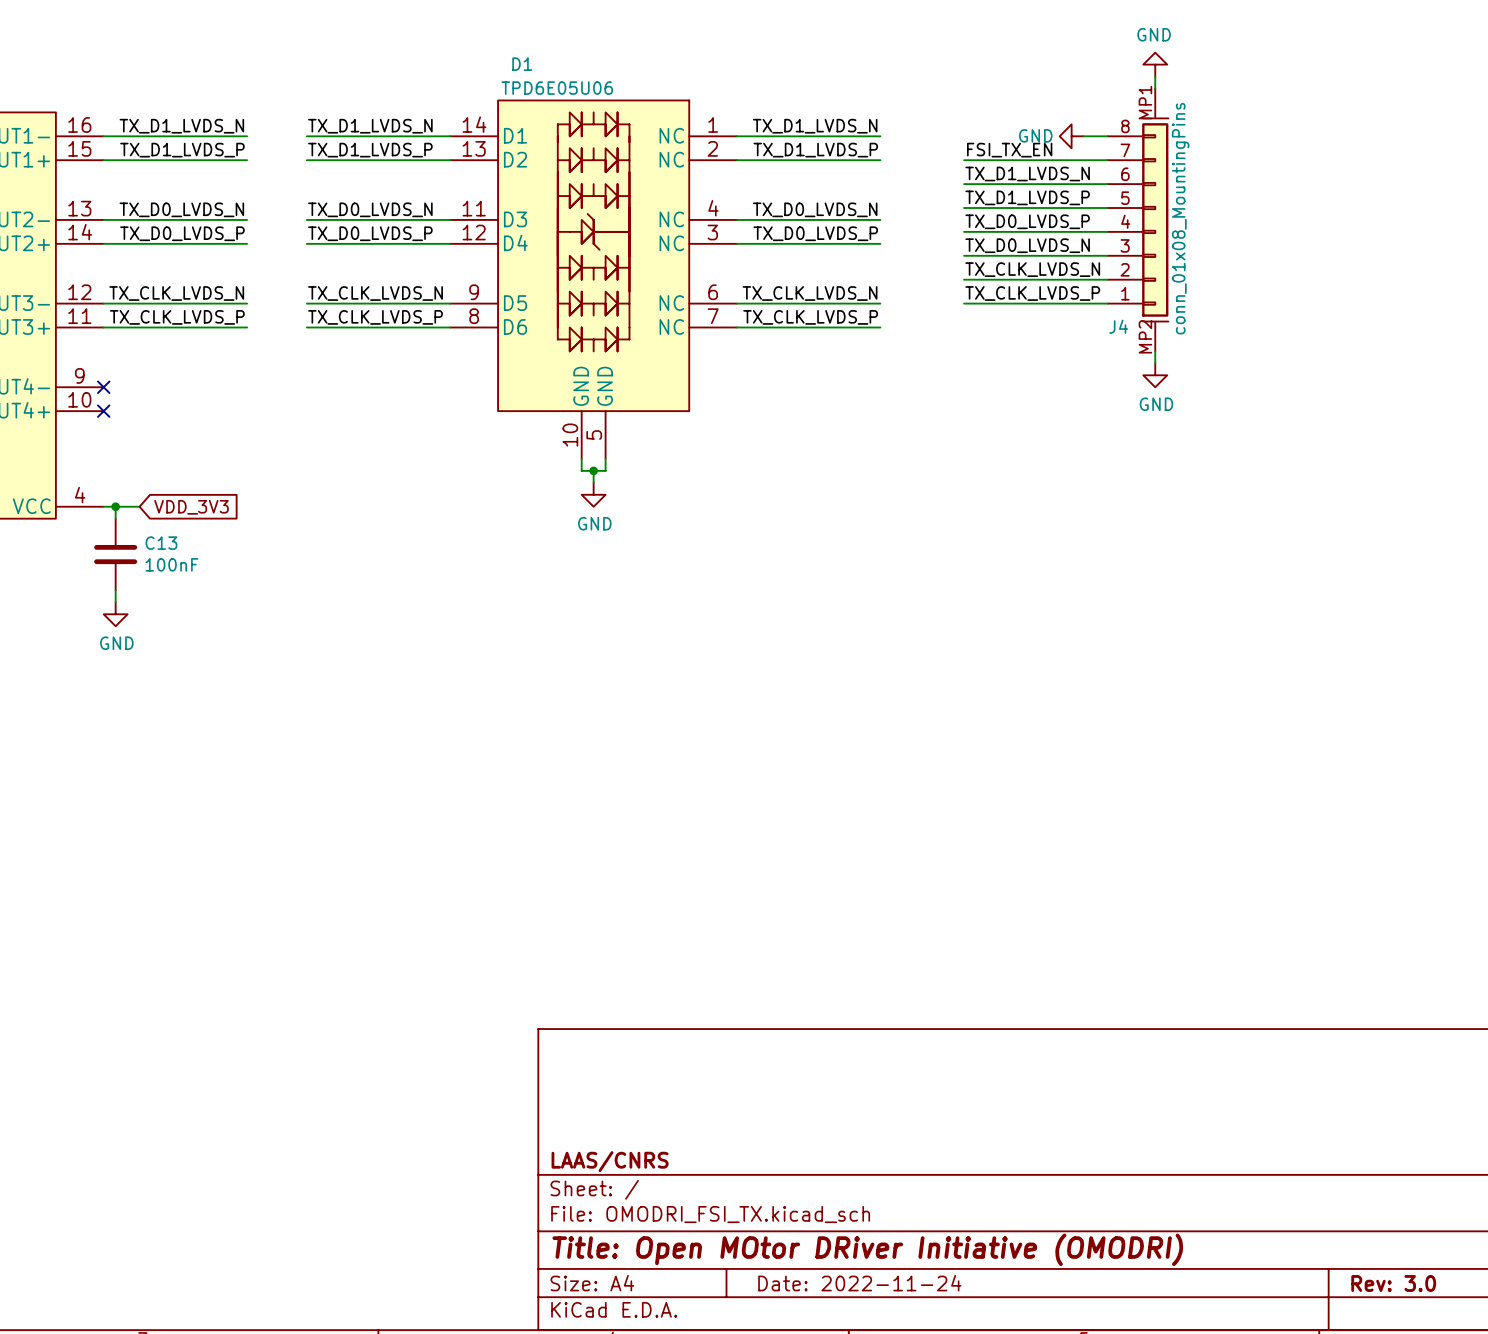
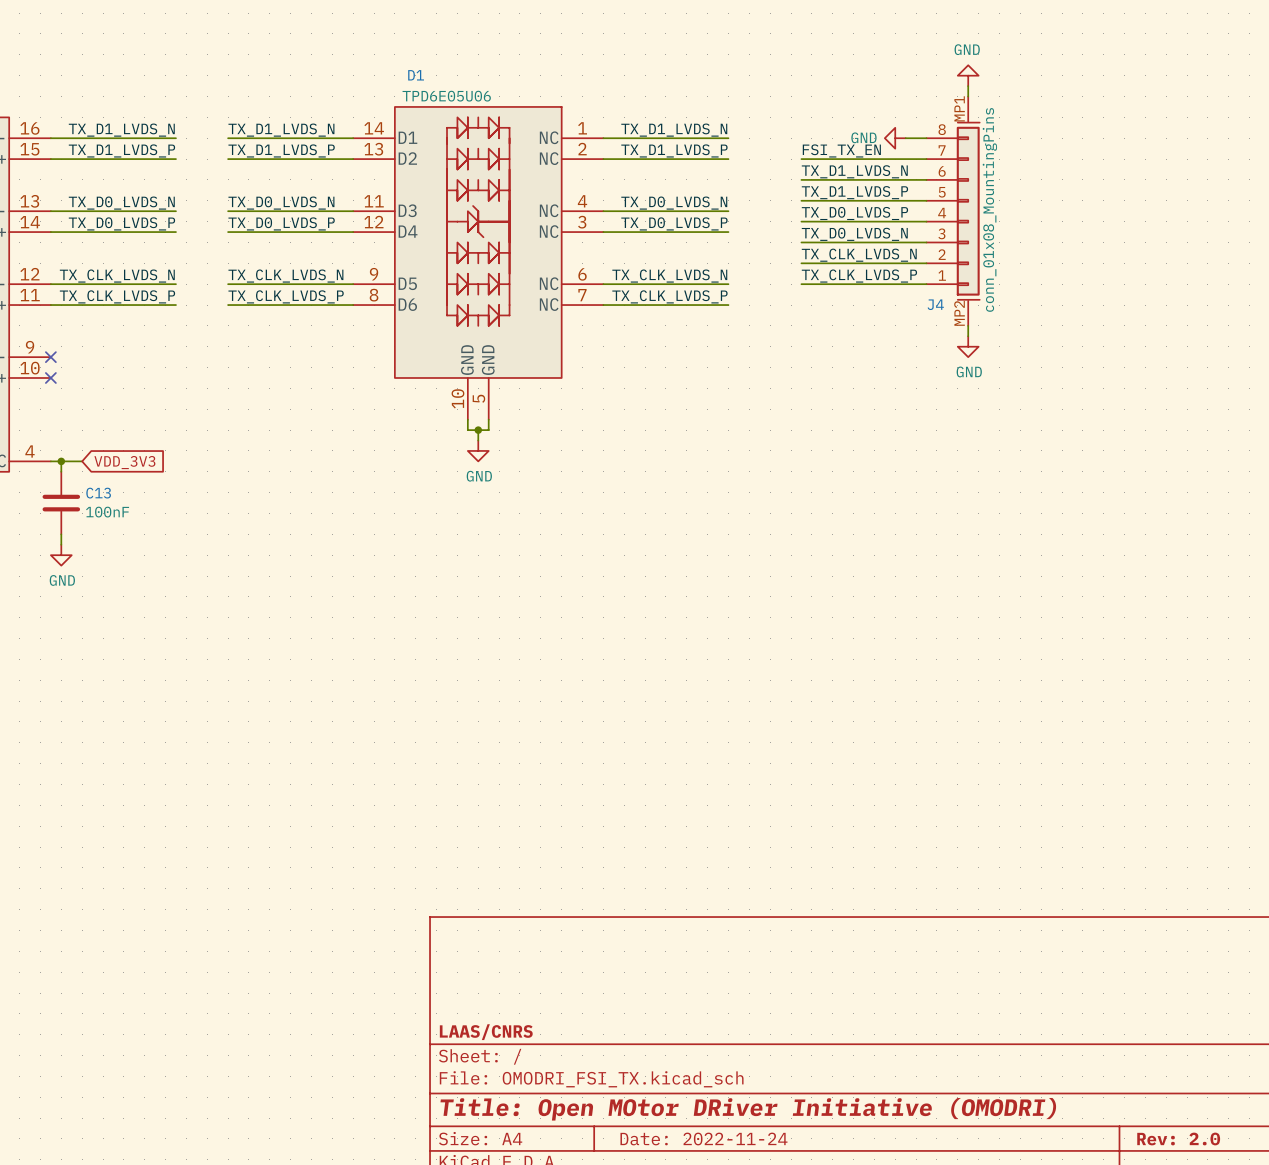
title block: Rev: 3.0 (1393, 1283) -> Rev: 2.0 (1178, 1138)

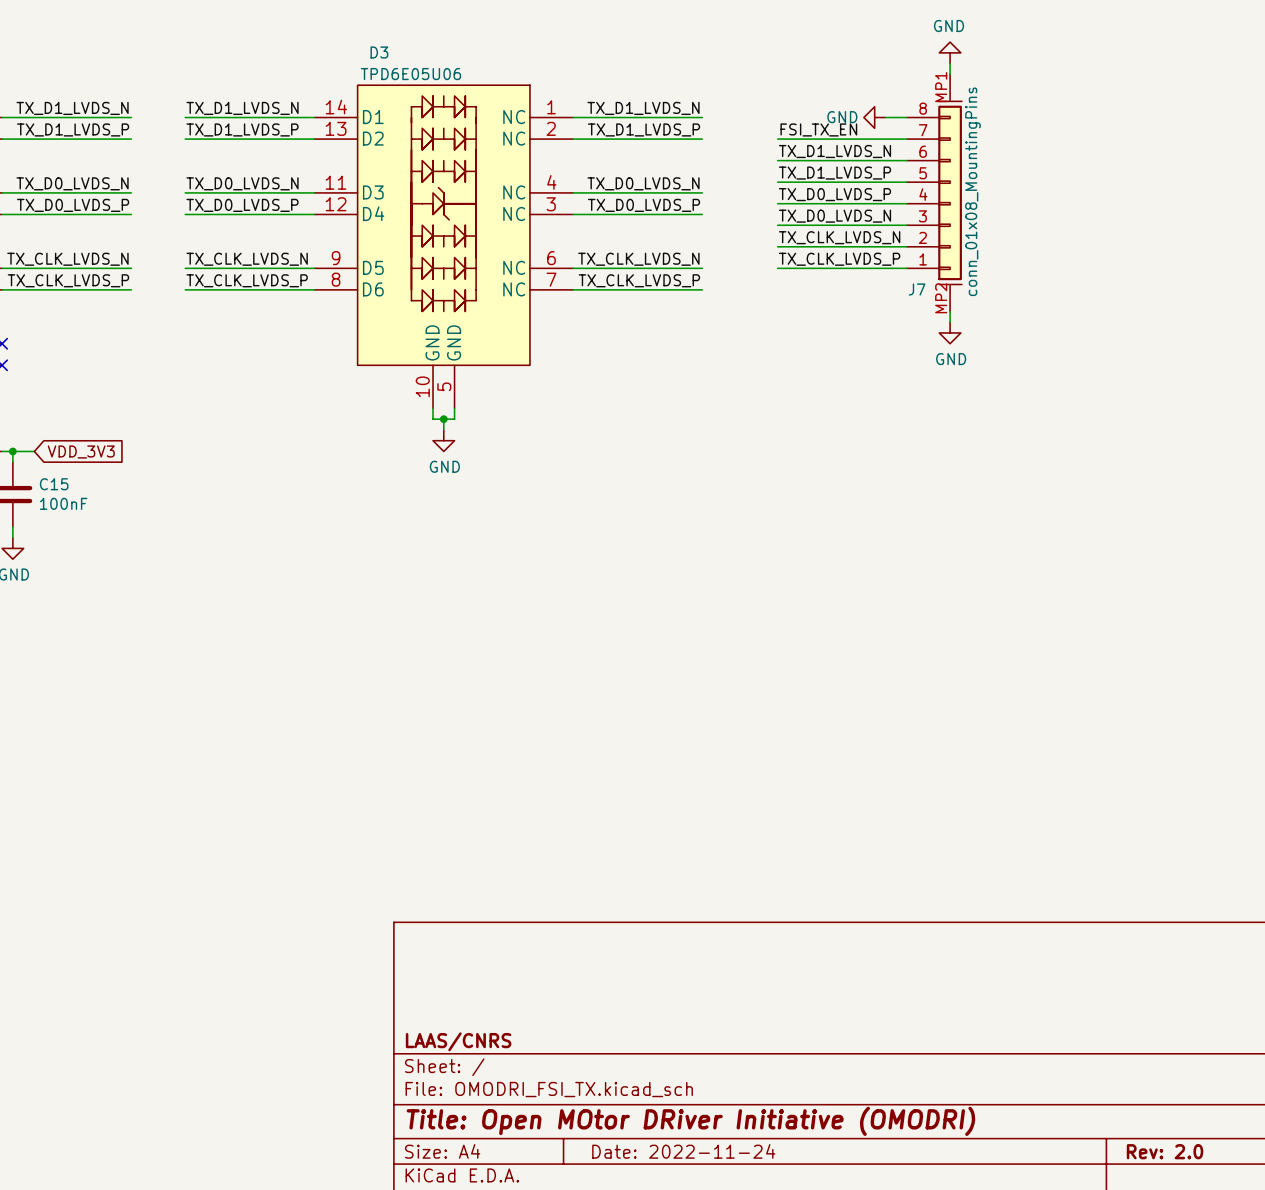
D1 name: D1 (416, 75) -> D3 (379, 52)
J4 name: J4 (935, 304) -> J7 (917, 289)
C13 name: C13 (98, 493) -> C15 (54, 484)

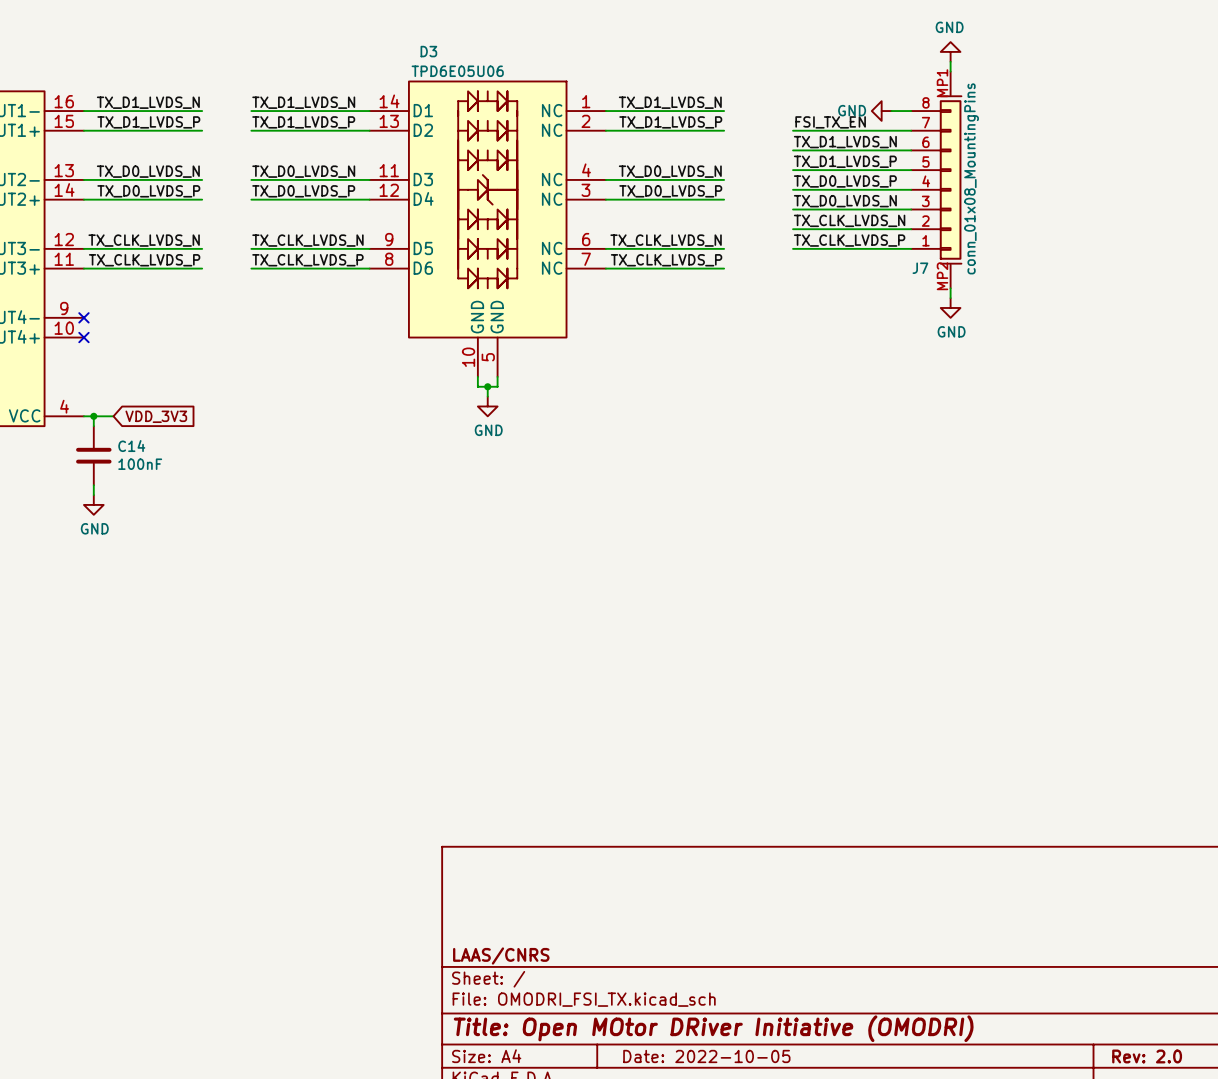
C15 name: C15 (54, 484) -> C14 (131, 446)
title block: Date: 2022-11-24 (683, 1151) -> Date: 2022-10-05 (706, 1056)

